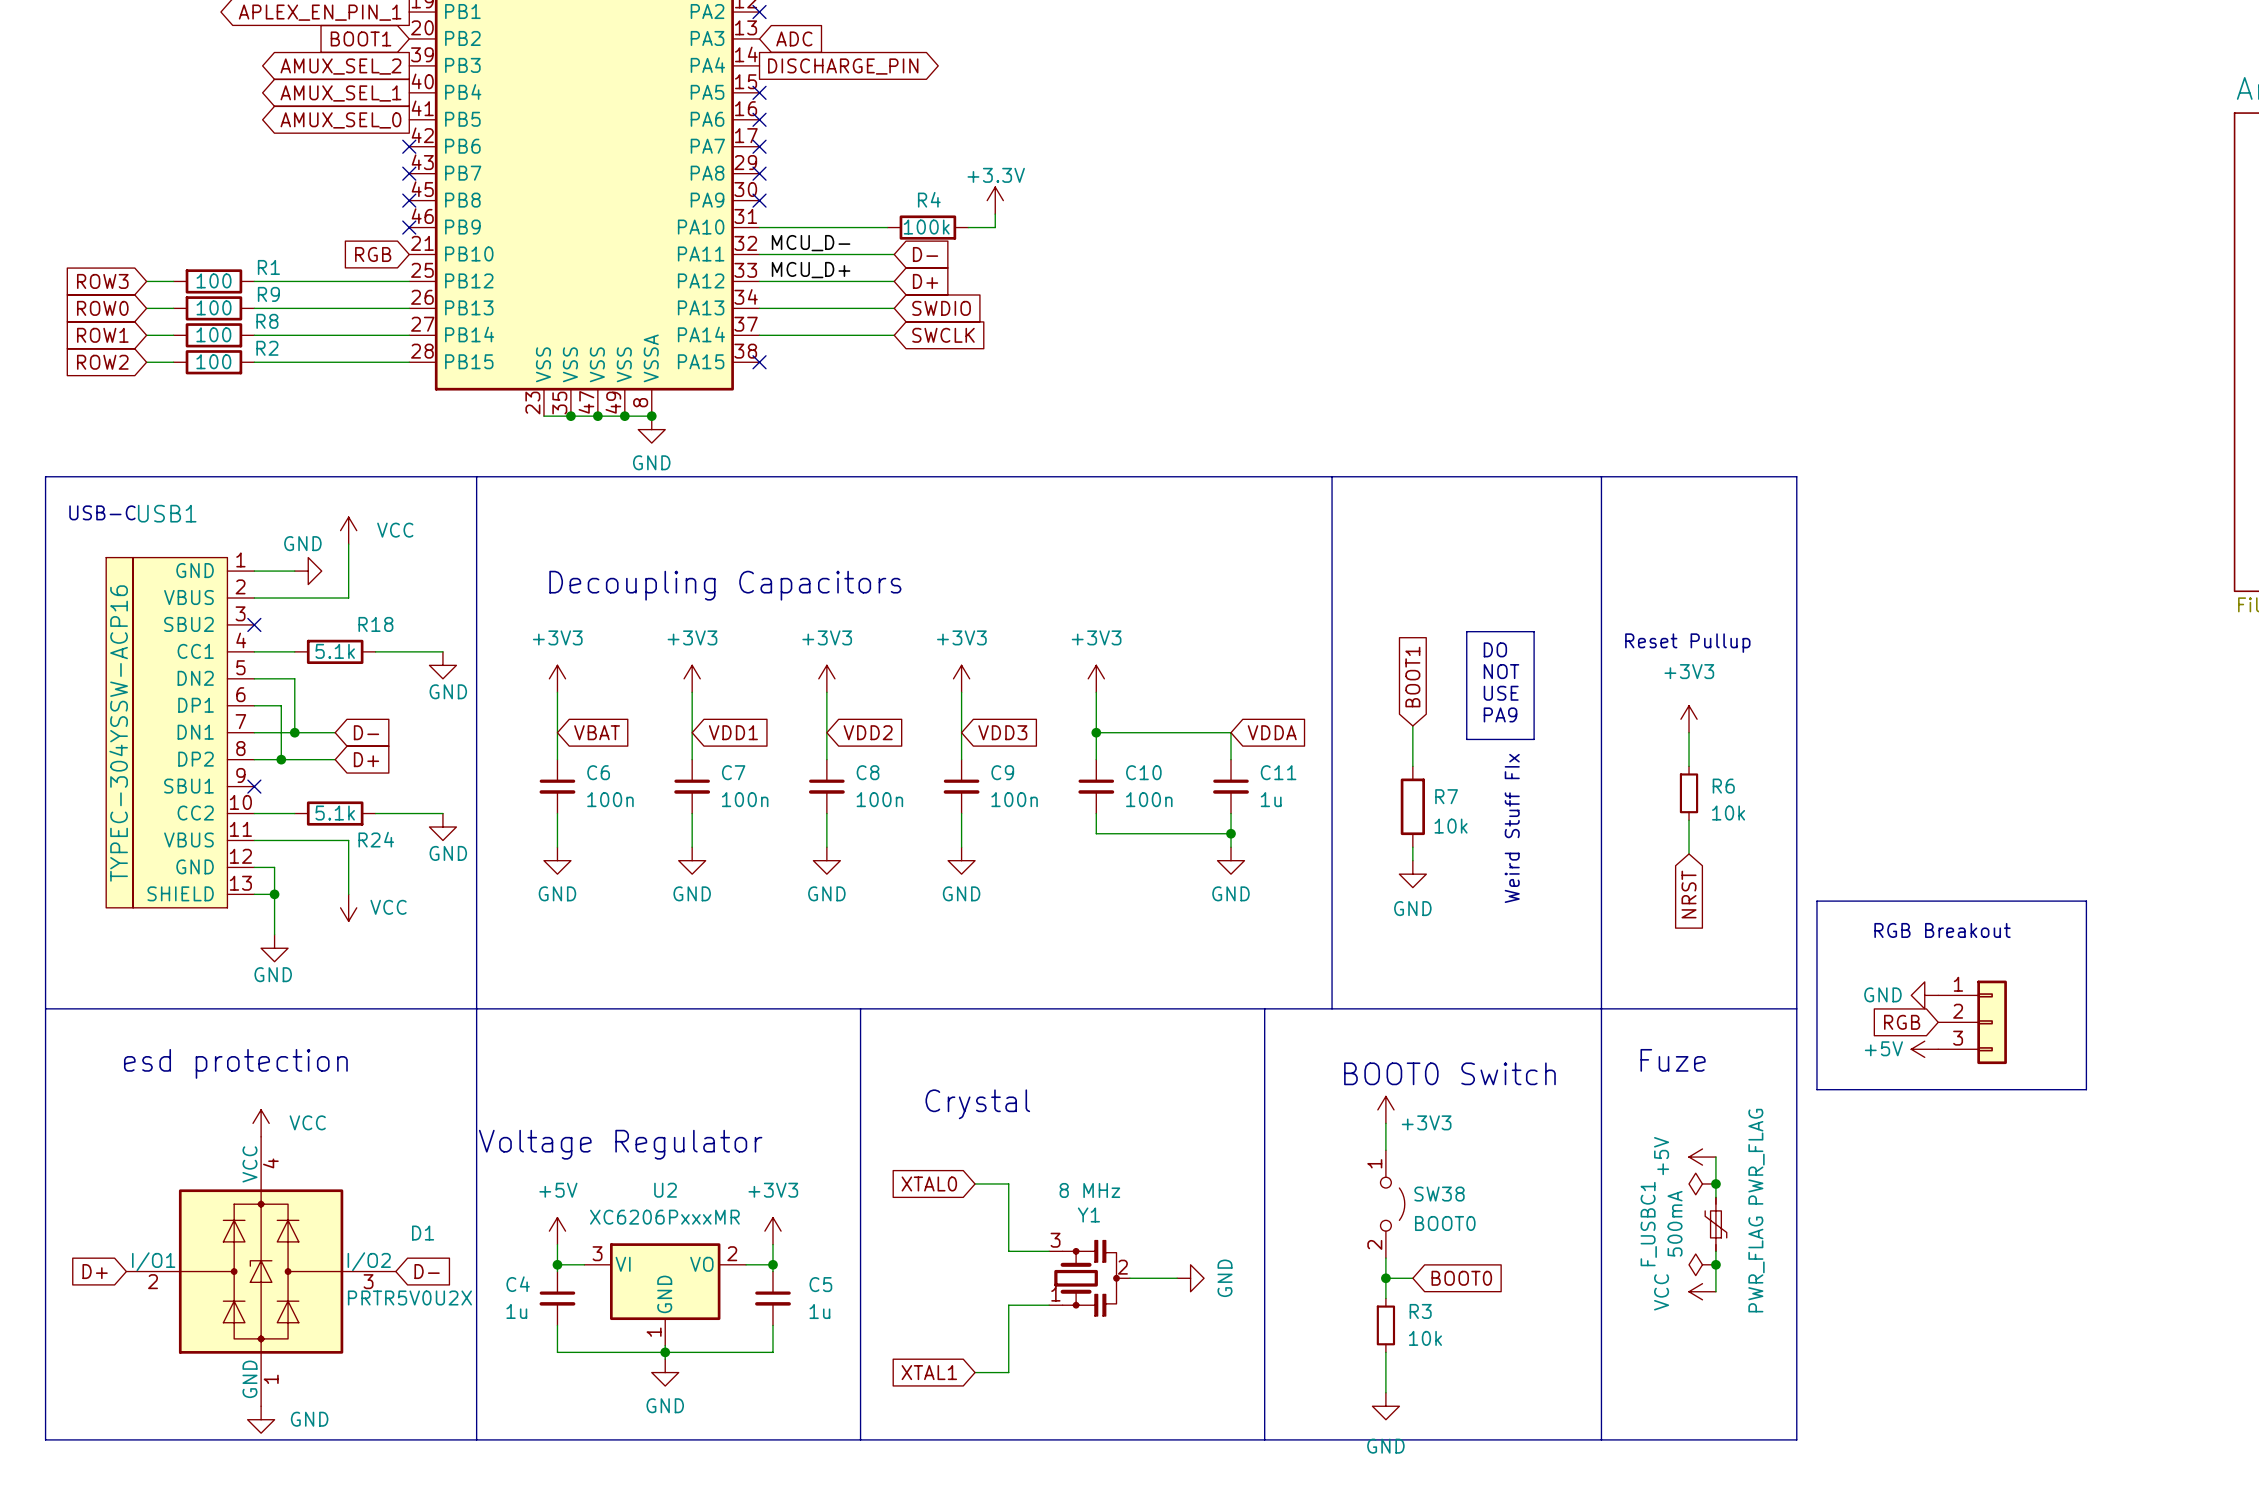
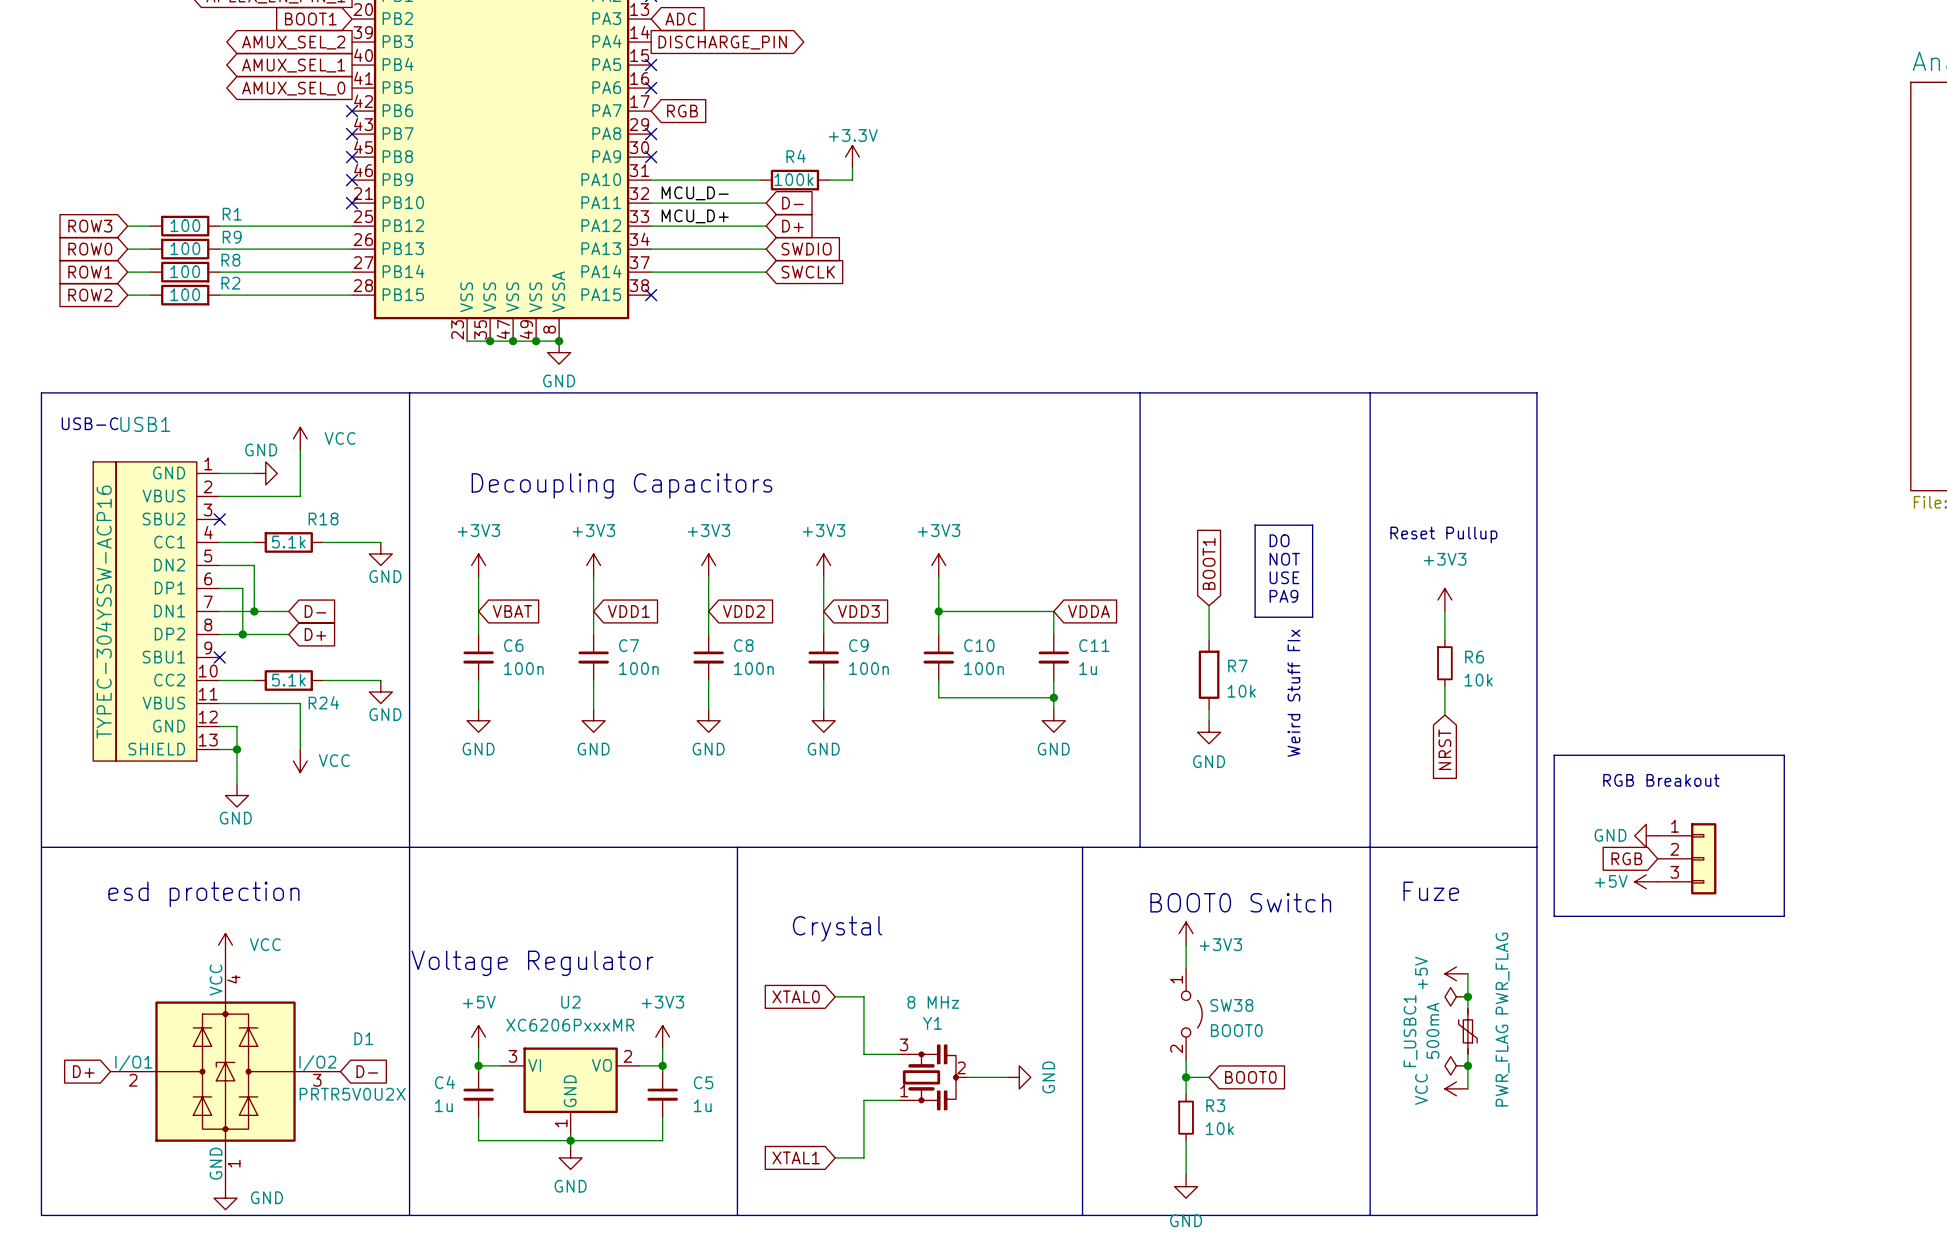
no-connect mark: (759, 146) -> none
global label: none -> RGB (682, 111)
global label: RGB (373, 254) -> none
no-connect mark: none -> (352, 203)

